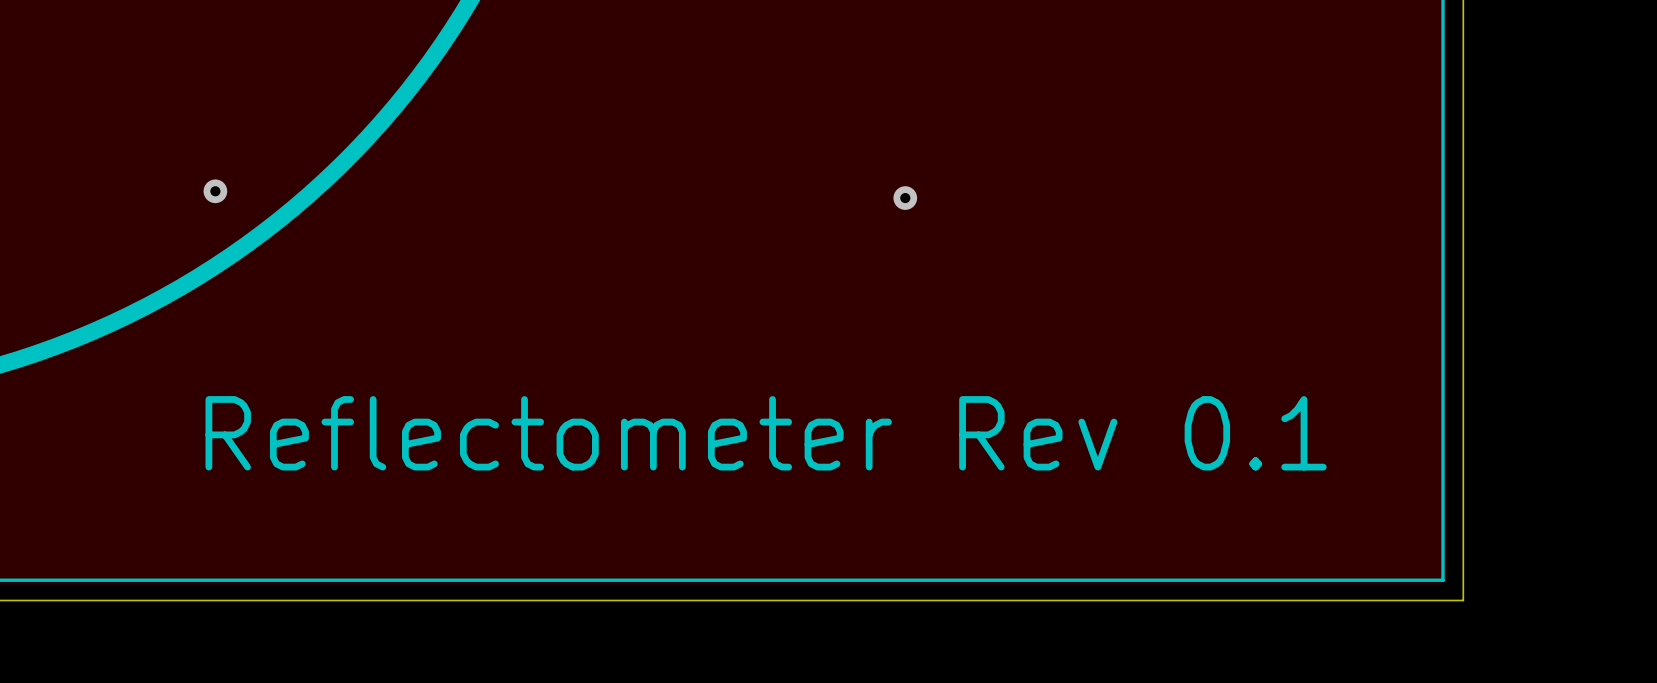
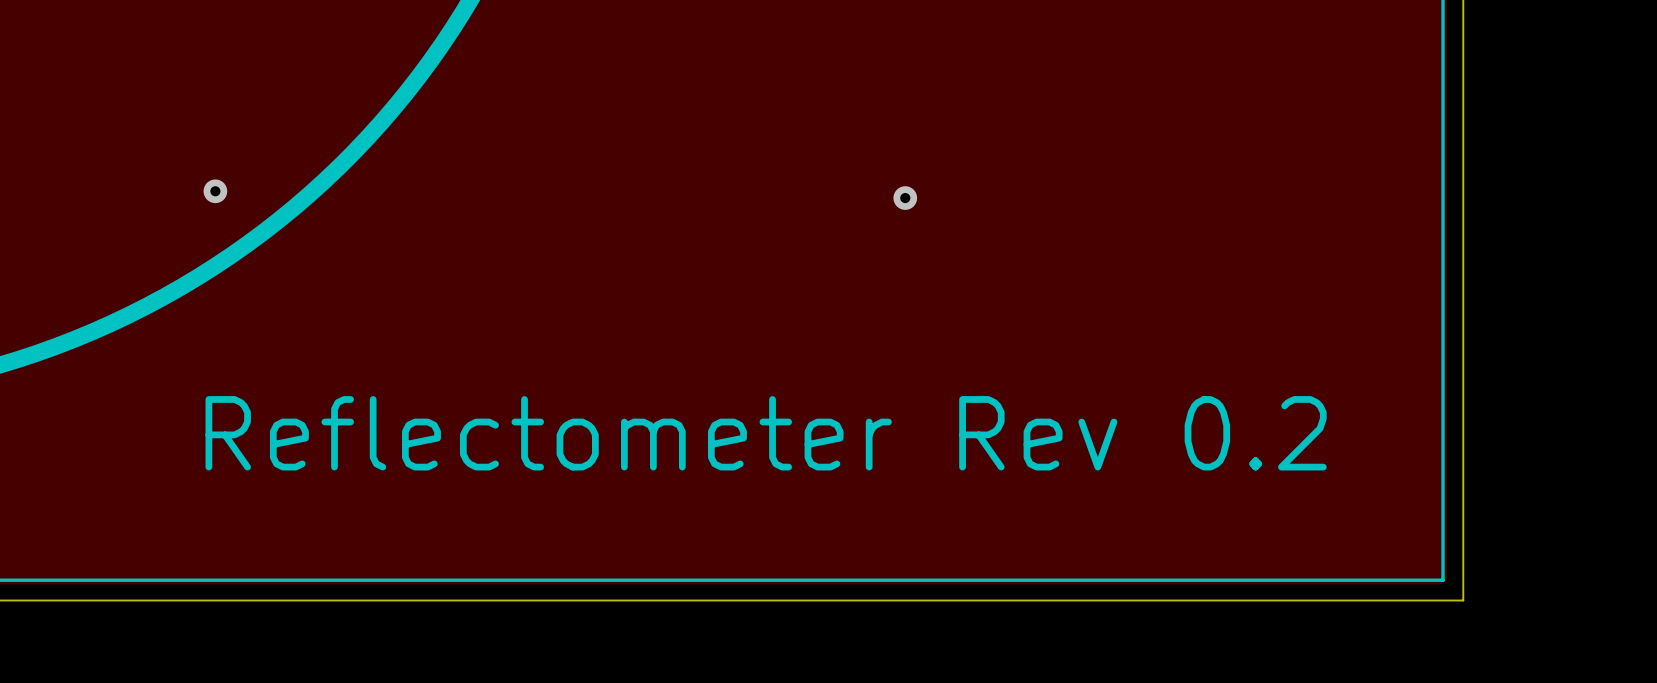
text: Reflectometer Rev 0.1 (766, 433) -> Reflectometer Rev 0.2 (766, 433)

